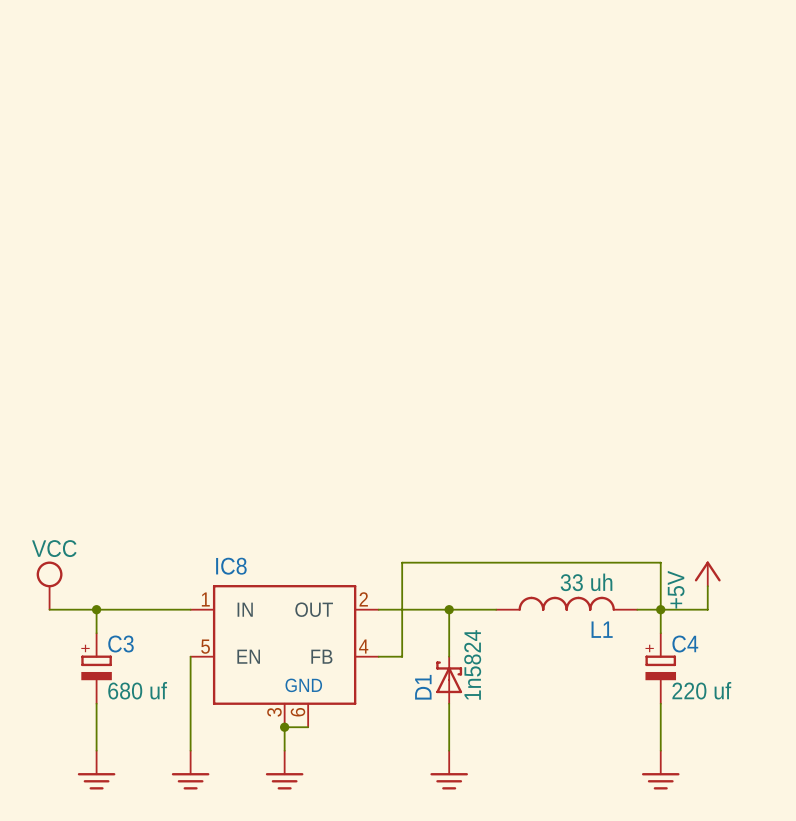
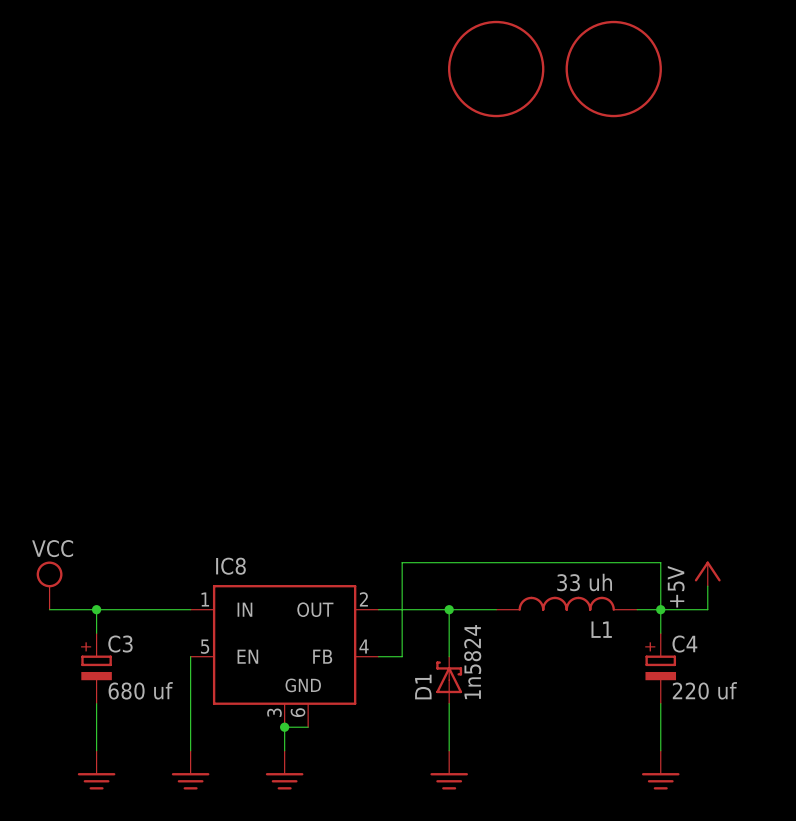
part: none -> (496, 69)
part: none -> (613, 69)

